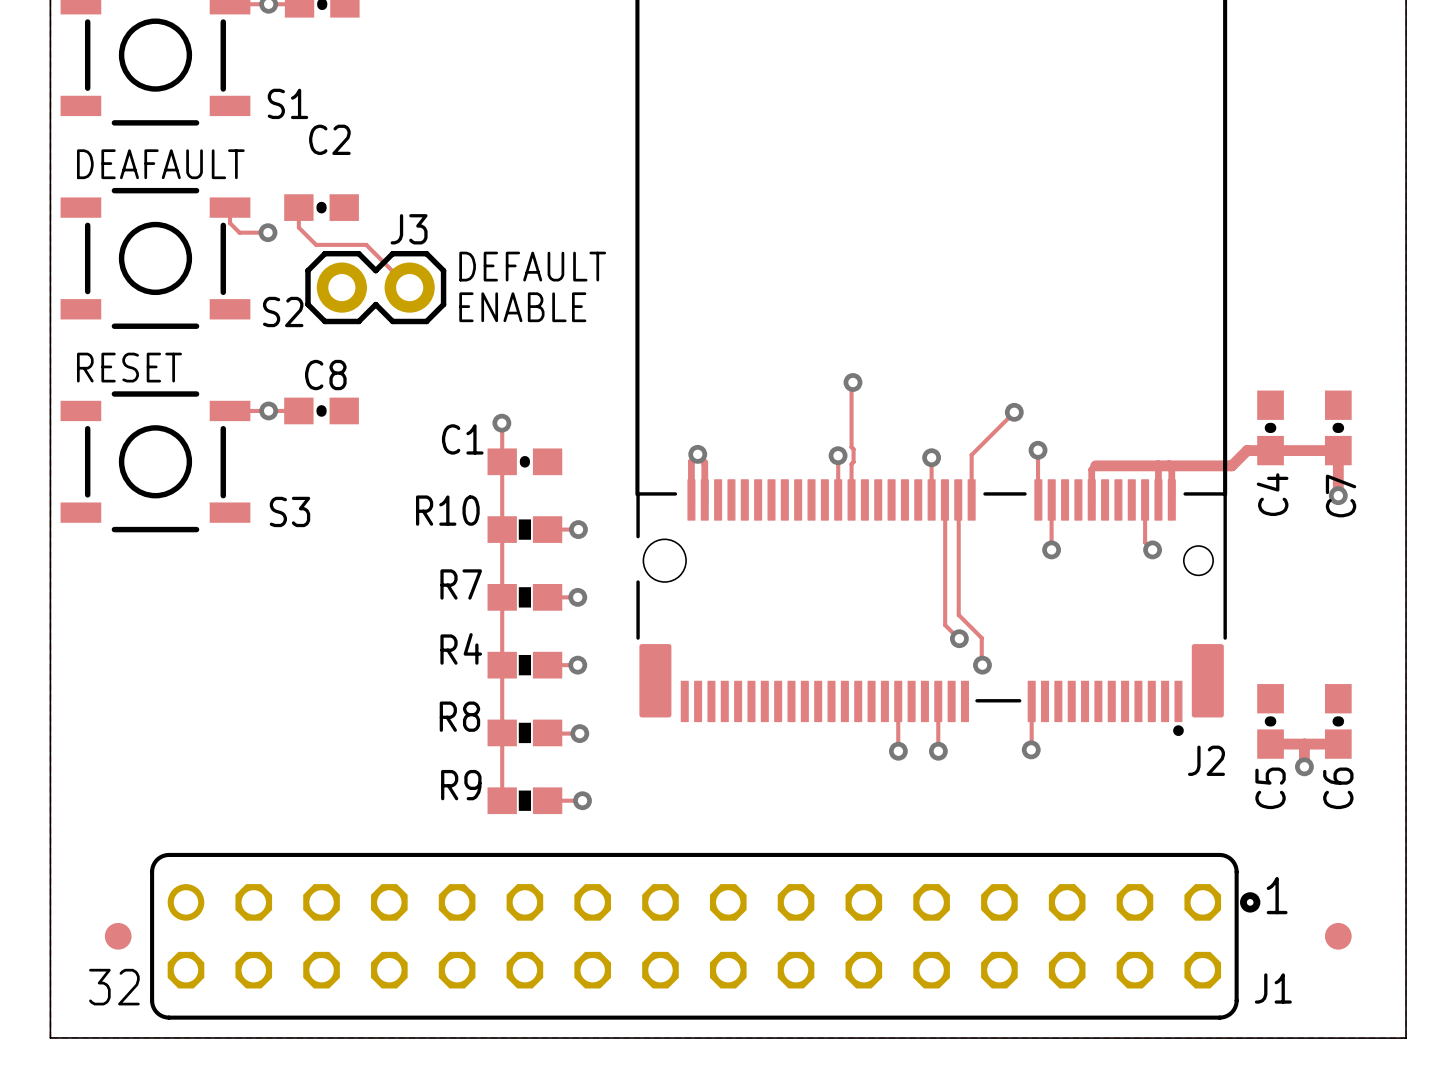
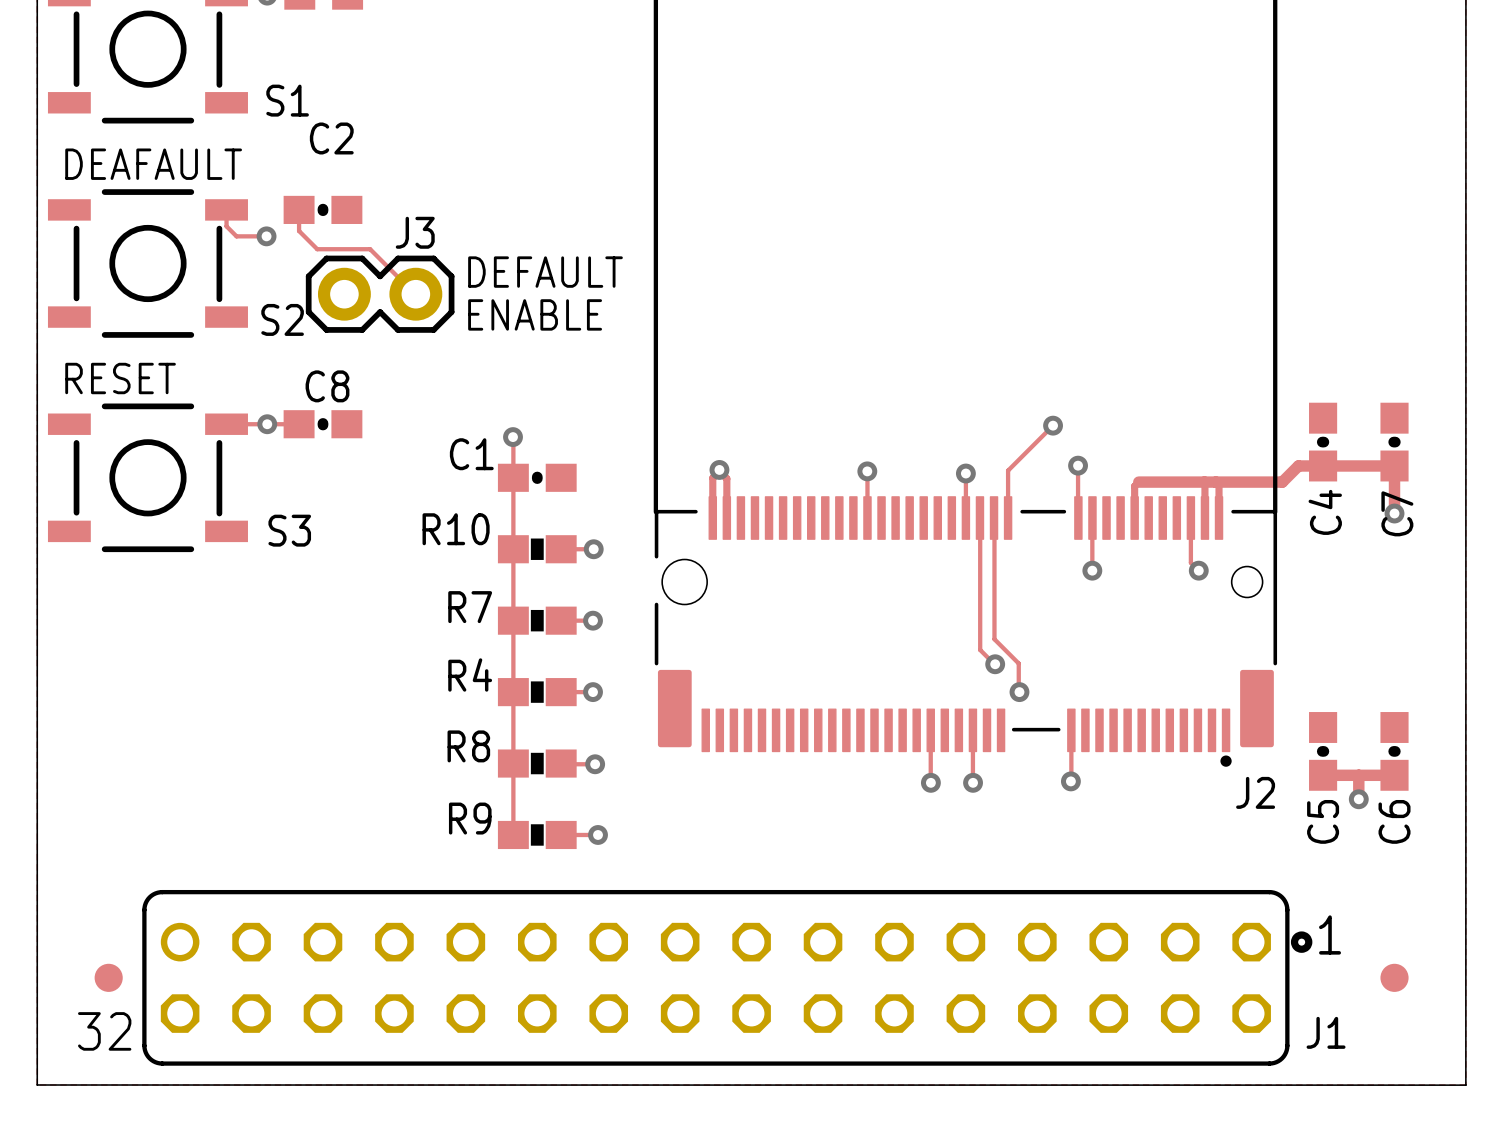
track: (852, 382) (851, 447) (853, 449) (853, 462) (851, 464) (851, 499) -> none
via: (852, 382) -> none

